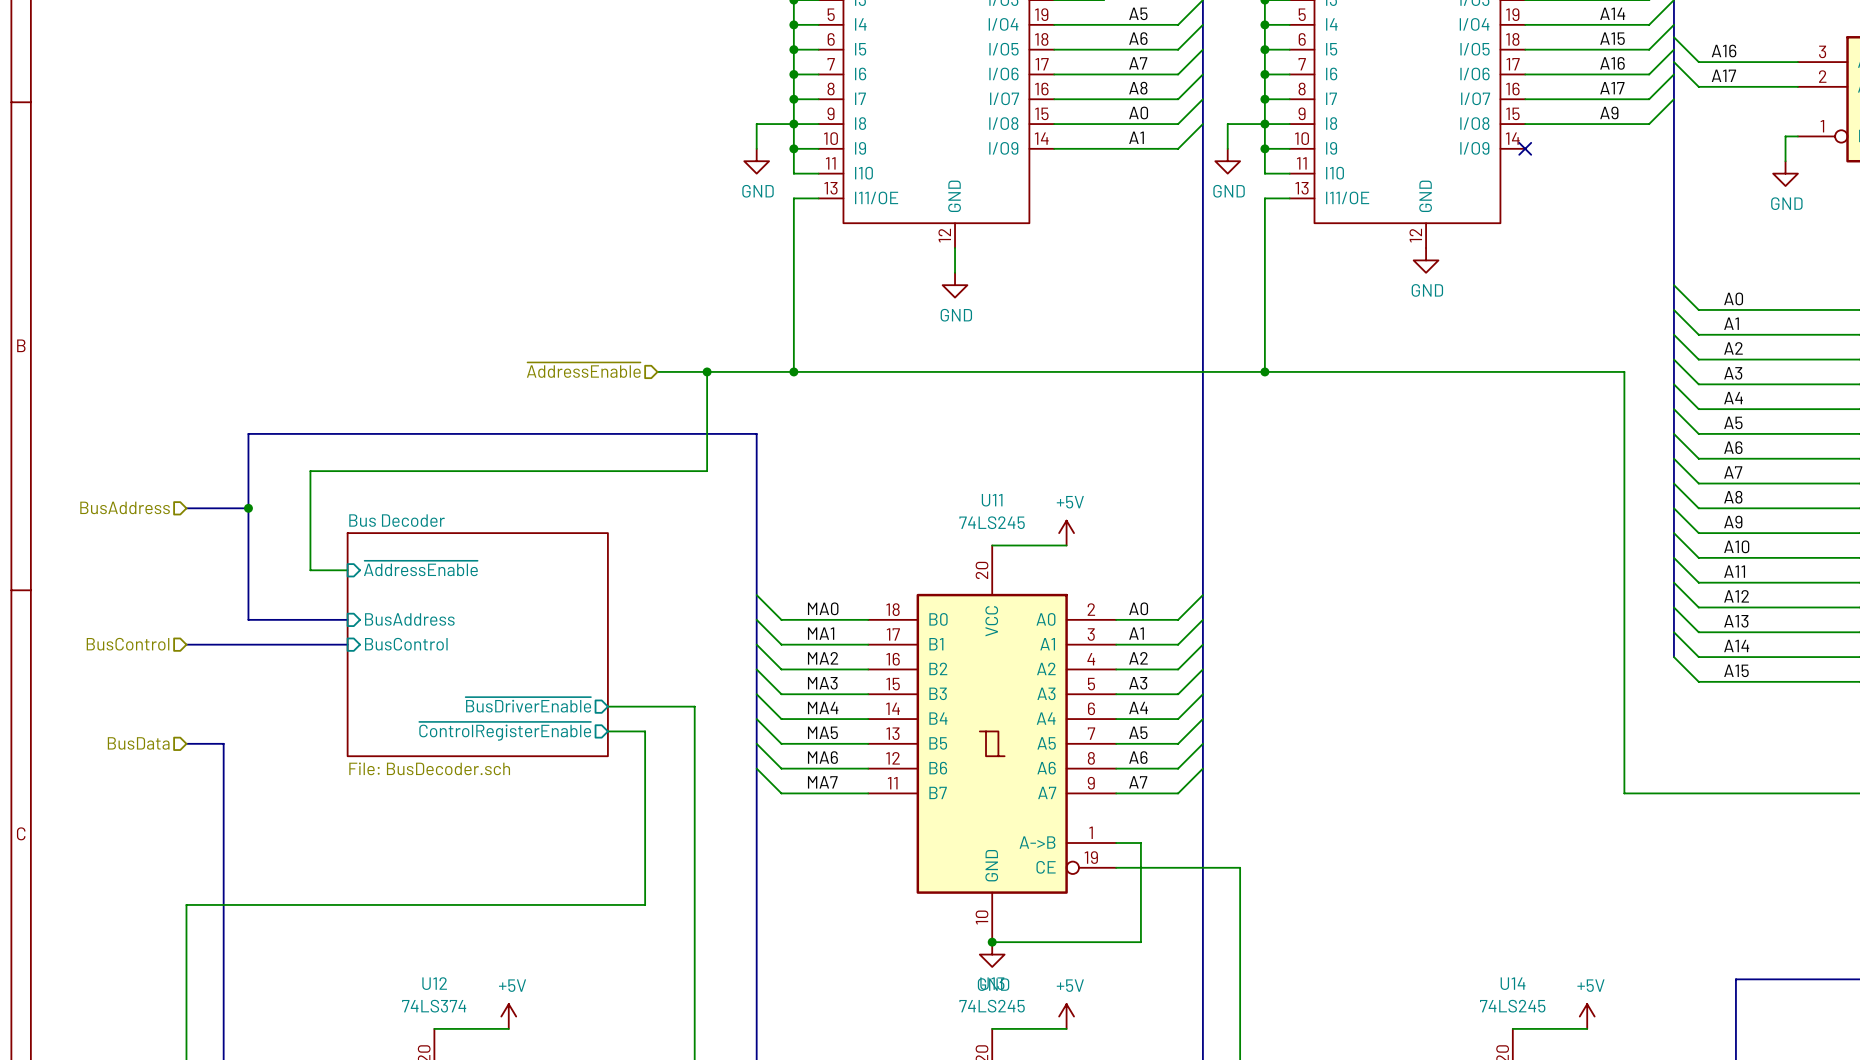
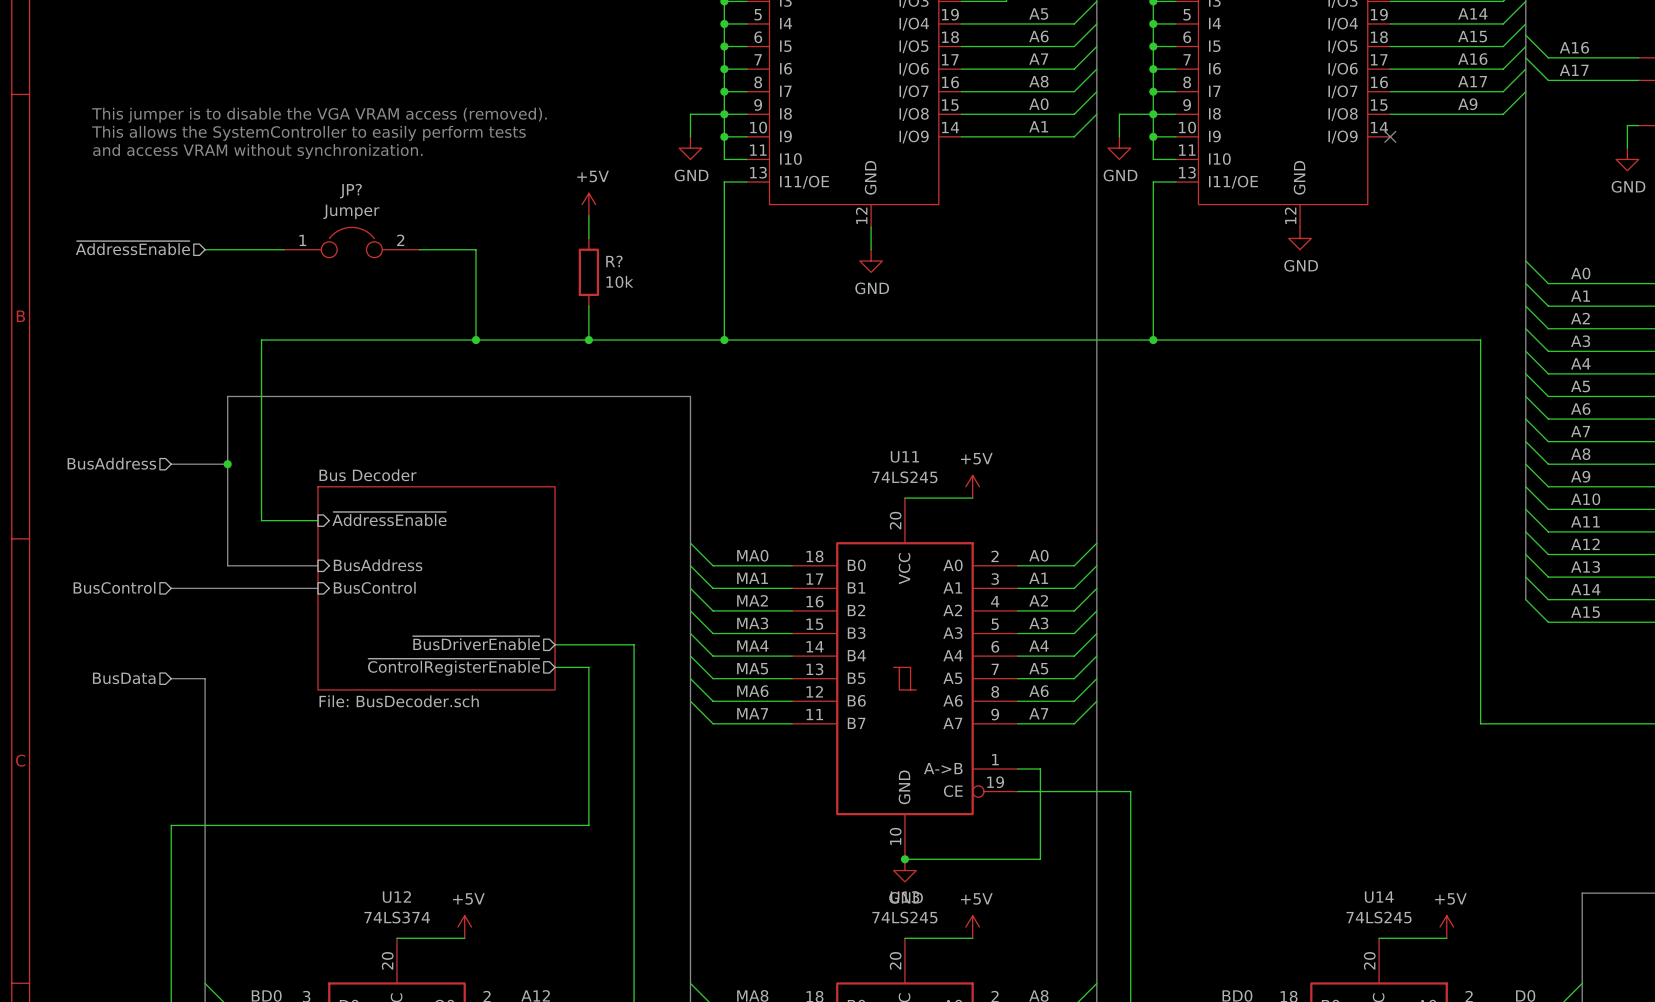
text: none -> This jumper is to disable the VGA VRAM access (removed). (319, 115)
text: none -> This allows the SystemController to easily perform tests (308, 133)
text: none -> and access VRAM without synchronization. (257, 151)
power symbol: none -> +5V (588, 204)
wire: none -> (588, 215) (588, 238)
JP?: none -> Jumper (351, 242)
hierarchical label: none -> ~{AddressEnable} (132, 248)
wire: none -> (205, 249) (284, 249)
wire: none -> (419, 249) (476, 249) (476, 340)
R?: none -> 10k (588, 272)
wire: none -> (588, 306) (588, 340)
hierarchical label: ~{AddressEnable} (583, 370) -> none
junction: none -> (476, 340)
junction: none -> (588, 340)
wire: (707, 371) (707, 471) (310, 471) (310, 570) -> (600, 340) (261, 340) (261, 520) (284, 520)
junction: (707, 371) -> none

